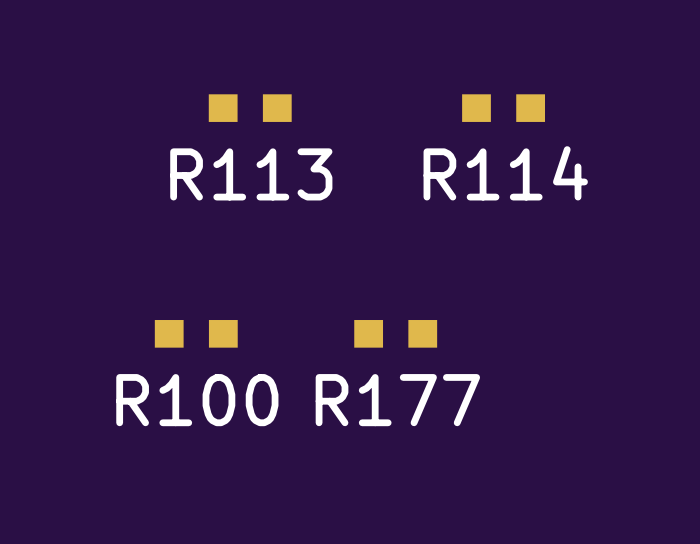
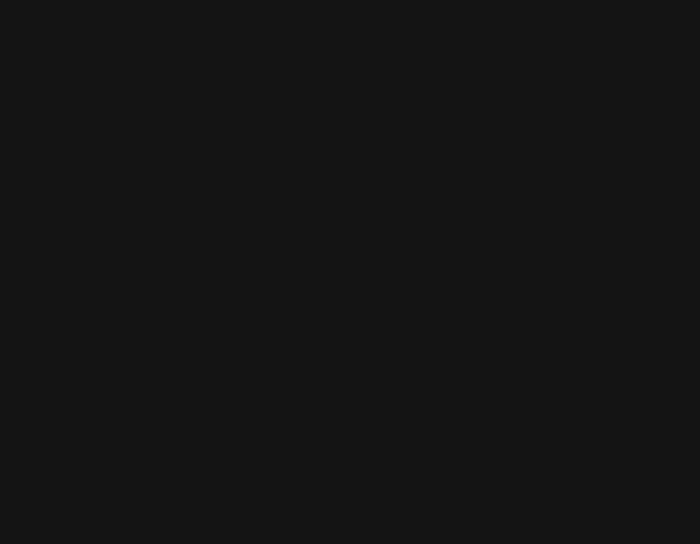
R113: (250, 108) -> none
R114: (503, 108) -> none
R100: (196, 333) -> none
R177: (395, 333) -> none

